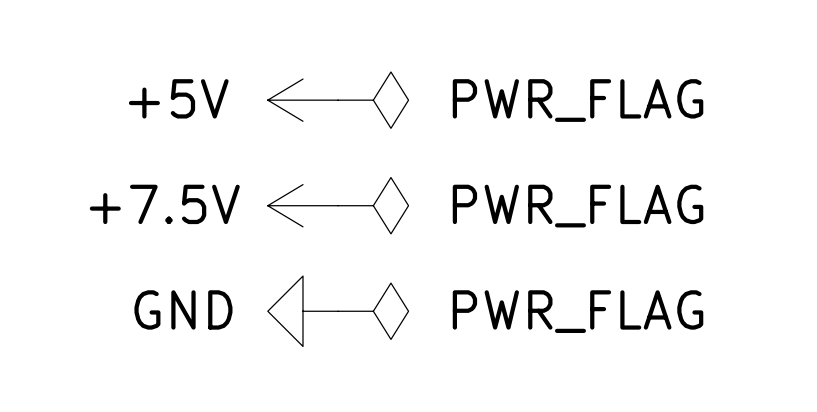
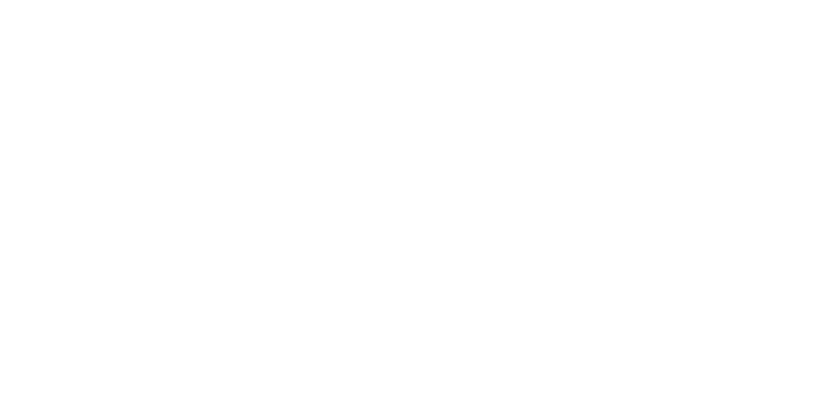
power symbol: +5V (302, 100) -> none
power symbol: PWR_FLAG (373, 100) -> none
power symbol: +7.5V (302, 205) -> none
power symbol: PWR_FLAG (373, 205) -> none
power symbol: GND (302, 311) -> none
power symbol: PWR_FLAG (373, 311) -> none

